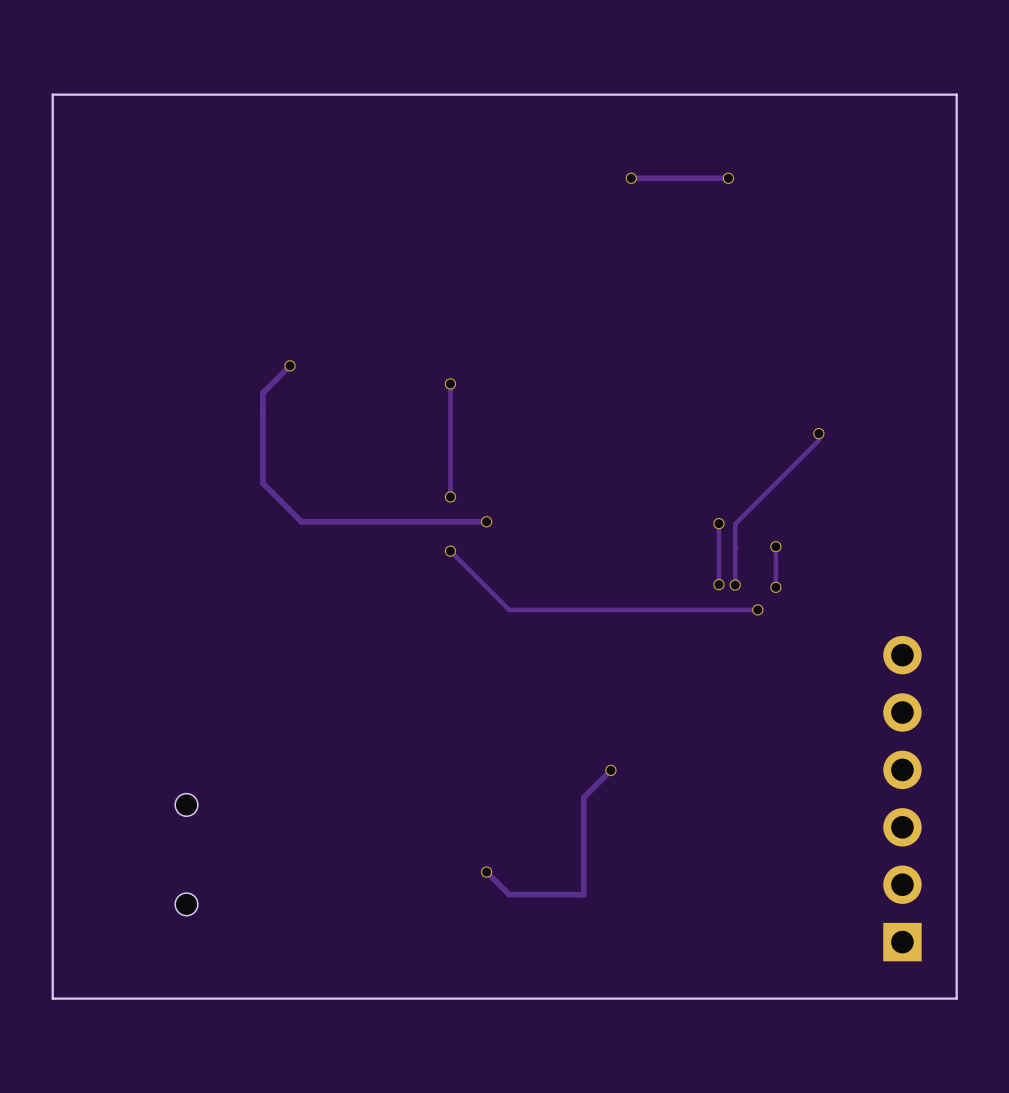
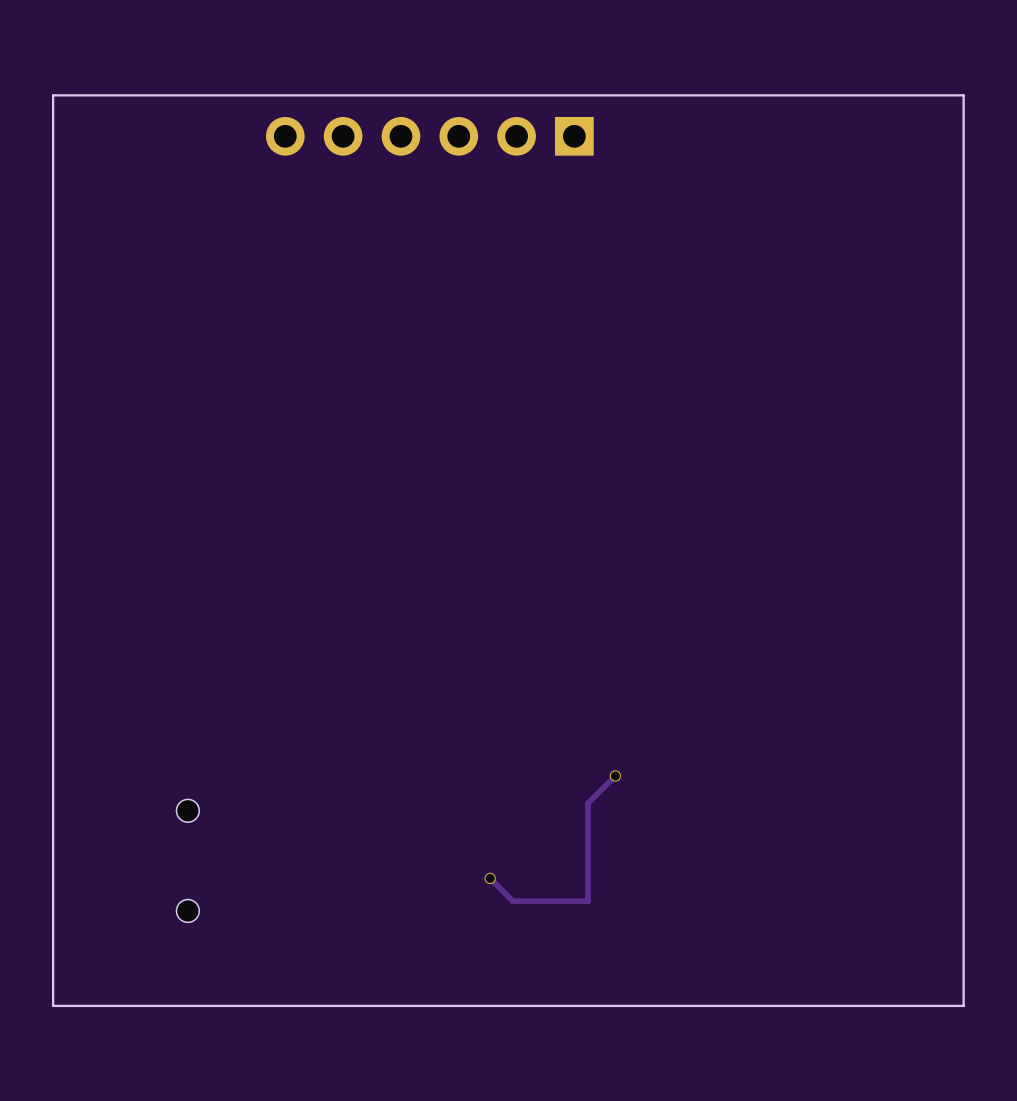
part: none -> (429, 136)
via: (631, 178) -> none
track: (728, 178) (631, 178) -> none
via: (728, 178) -> none
track: (290, 365) (262, 392) (262, 483) (301, 521) (486, 521) -> none
via: (290, 365) -> none
track: (450, 383) (450, 496) -> none
via: (450, 383) -> none
track: (818, 433) (818, 440) (735, 524) (735, 585) -> none
via: (818, 433) -> none
via: (450, 496) -> none
via: (486, 521) -> none
track: (718, 523) (718, 584) -> none
via: (718, 523) -> none
track: (775, 546) (775, 587) -> none
via: (775, 546) -> none
track: (450, 551) (509, 609) (757, 609) -> none
via: (450, 551) -> none
via: (718, 584) -> none
via: (735, 585) -> none
via: (775, 587) -> none
via: (757, 609) -> none
part: (902, 798) -> none

